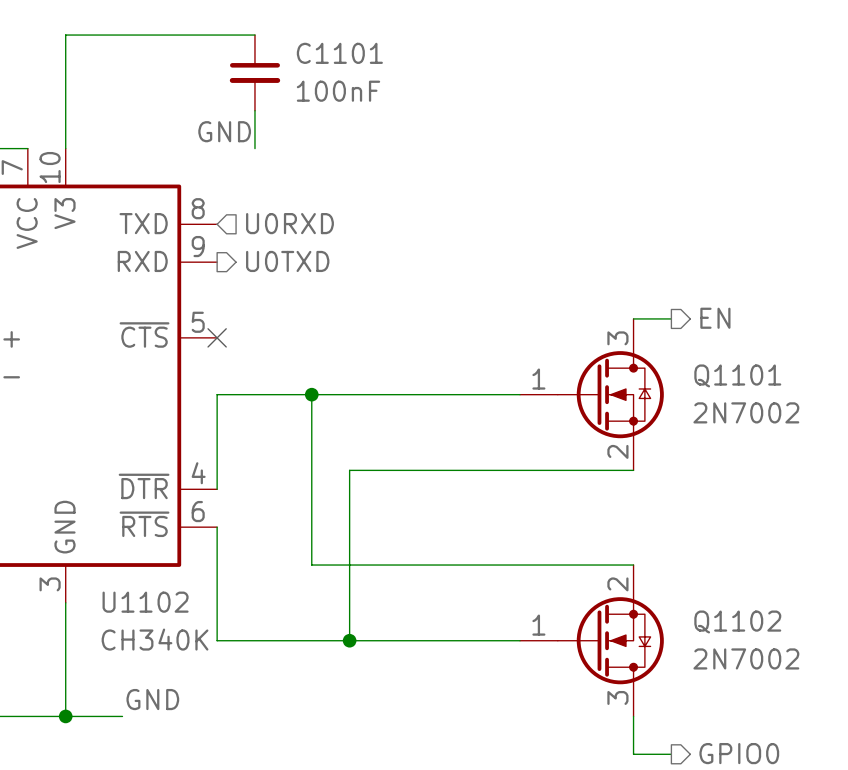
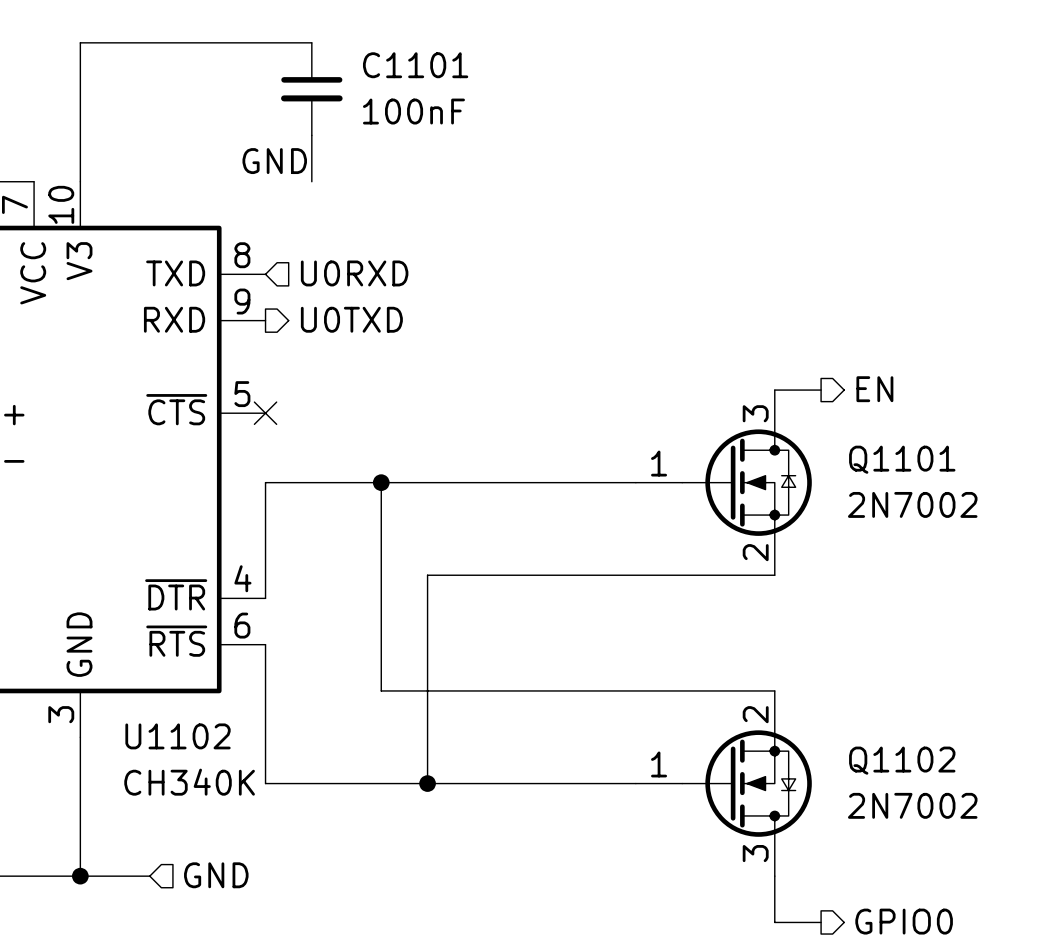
label: GND (152, 699) -> none
hierarchical label: none -> GND (216, 875)

